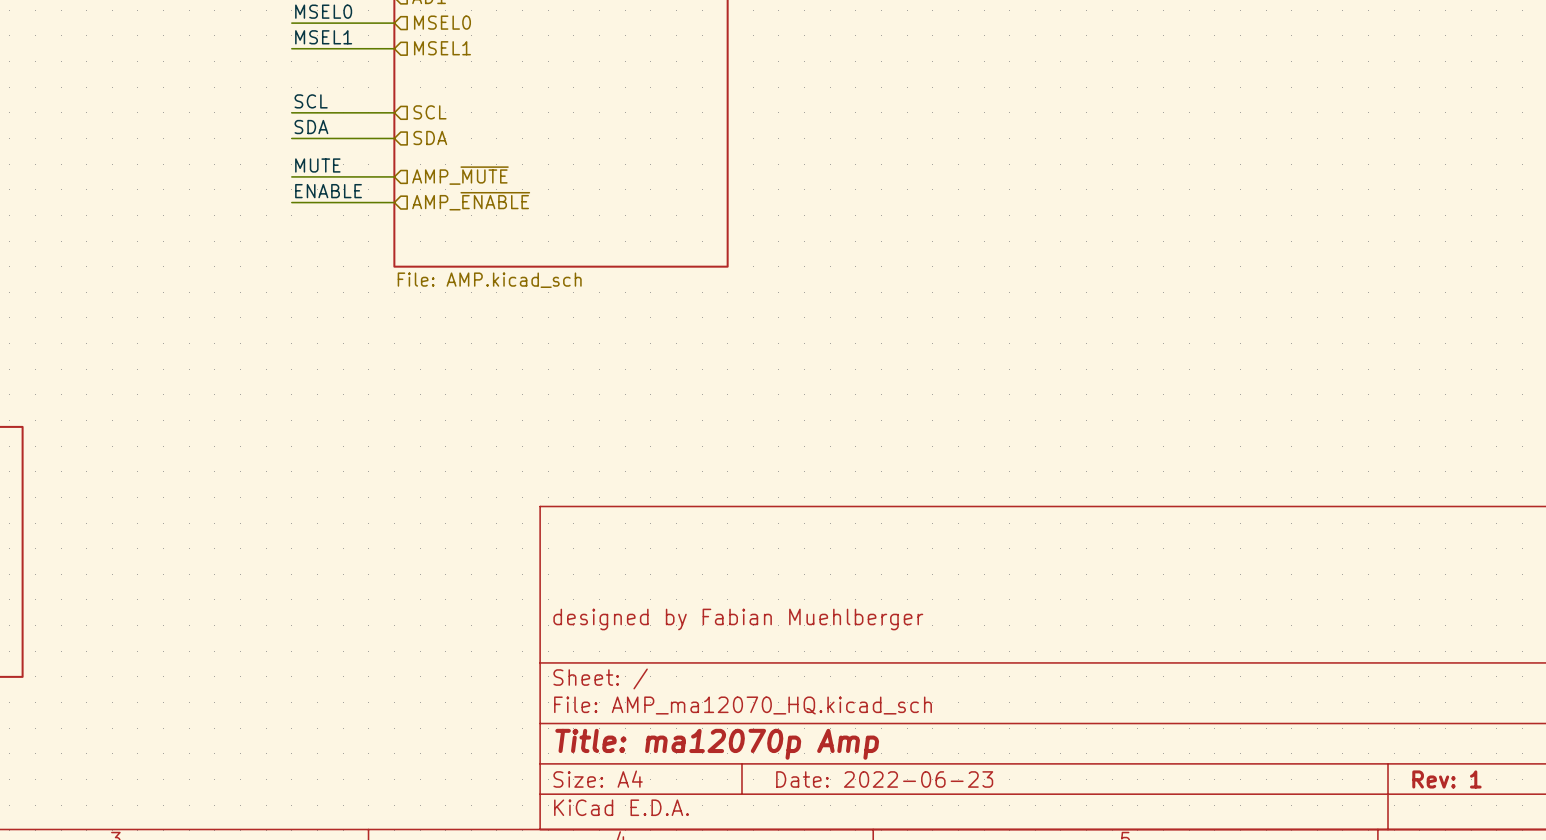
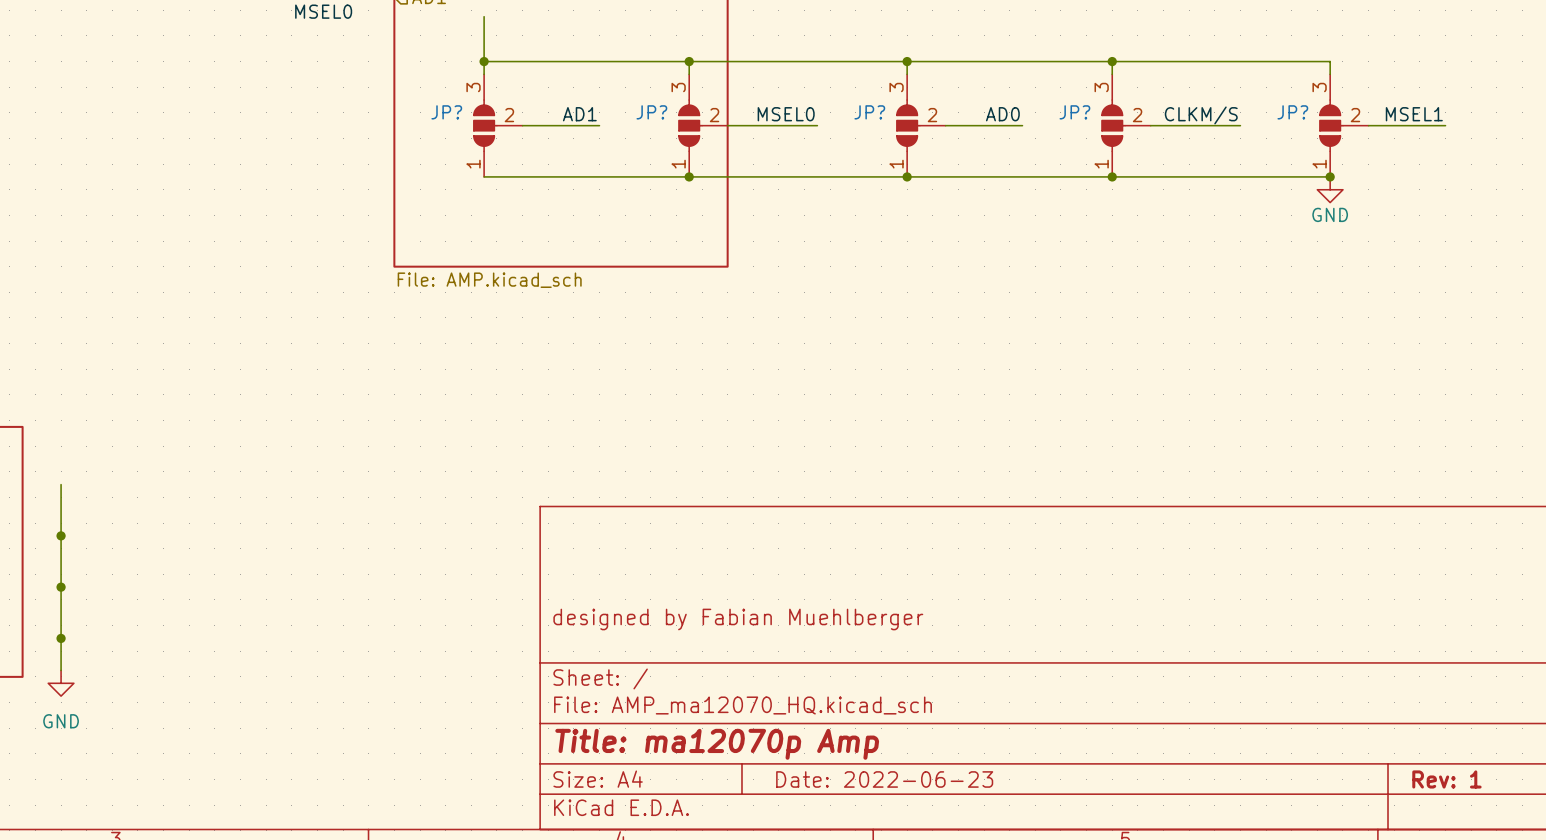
wire: none -> (484, 16) (484, 74)
hierarchical label: MSEL0 (442, 22) -> none
wire: (291, 23) (394, 23) -> none
label: MSEL1 (323, 37) -> none
wire: (291, 48) (394, 48) -> none
hierarchical label: MSEL1 (442, 48) -> none
wire: none -> (484, 61) (1330, 61) (1330, 74)
junction: none -> (484, 61)
wire: none -> (689, 61) (689, 74)
junction: none -> (689, 61)
wire: none -> (907, 61) (907, 74)
junction: none -> (907, 61)
wire: none -> (1112, 61) (1112, 74)
junction: none -> (1112, 61)
label: SCL (311, 101) -> none
wire: (291, 112) (394, 112) -> none
hierarchical label: SCL (429, 112) -> none
label: none -> AD1 (579, 114)
label: none -> MSEL0 (786, 114)
label: none -> AD0 (1002, 114)
label: none -> MSEL1 (1414, 114)
label: none -> CLKM/S (1201, 115)
JP?: none -> (498, 125)
wire: none -> (522, 125) (599, 125)
JP?: none -> (703, 125)
wire: none -> (727, 125) (817, 125)
JP?: none -> (921, 125)
wire: none -> (945, 125) (1022, 125)
JP?: none -> (1126, 125)
wire: none -> (1150, 125) (1240, 125)
JP?: none -> (1344, 125)
wire: none -> (1368, 125) (1445, 125)
label: SDA (311, 127) -> none
wire: (291, 138) (394, 138) -> none
hierarchical label: SDA (430, 138) -> none
label: MUTE (317, 165) -> none
hierarchical label: AMP_~{MUTE} (460, 175) -> none
wire: (291, 176) (394, 176) -> none
wire: none -> (484, 176) (1330, 176)
junction: none -> (689, 176)
junction: none -> (907, 176)
junction: none -> (1112, 176)
junction: none -> (1330, 176)
power symbol: none -> GND (1330, 189)
label: ENABLE (328, 191) -> none
hierarchical label: AMP_~{ENABLE} (471, 201) -> none
wire: (291, 202) (394, 202) -> none
wire: none -> (61, 484) (61, 670)
junction: none -> (61, 535)
junction: none -> (61, 587)
junction: none -> (61, 638)
power symbol: none -> GND (61, 683)

